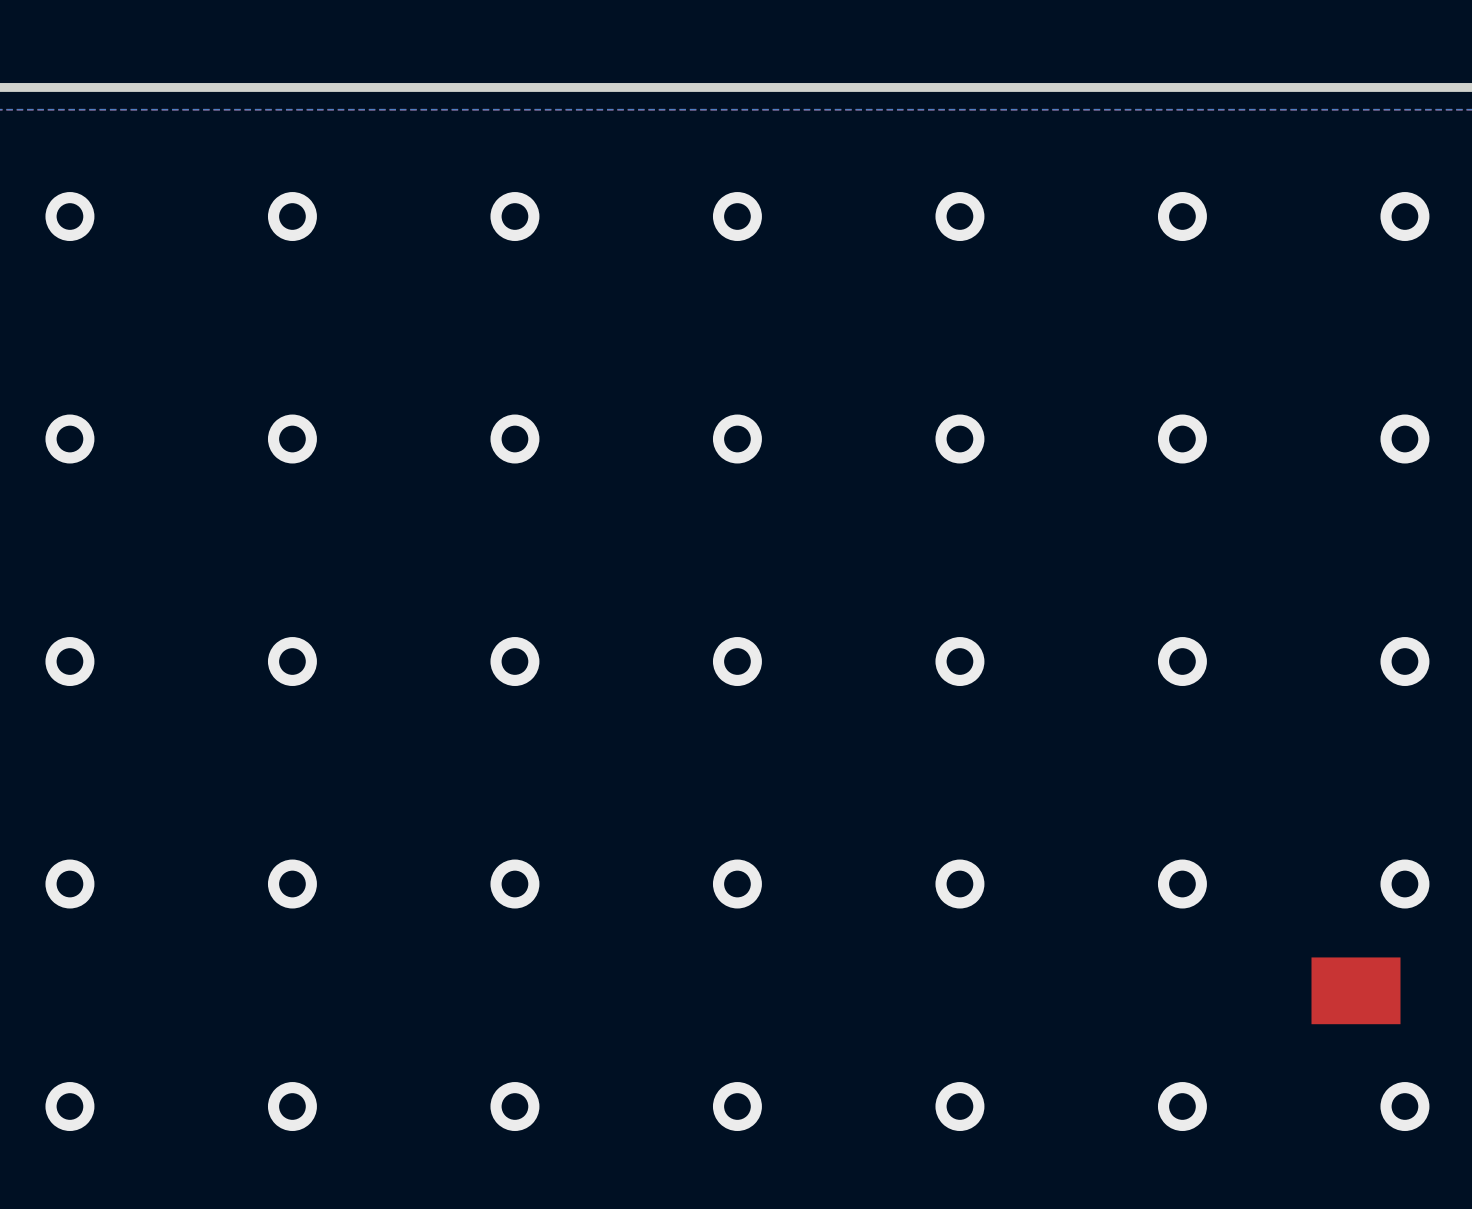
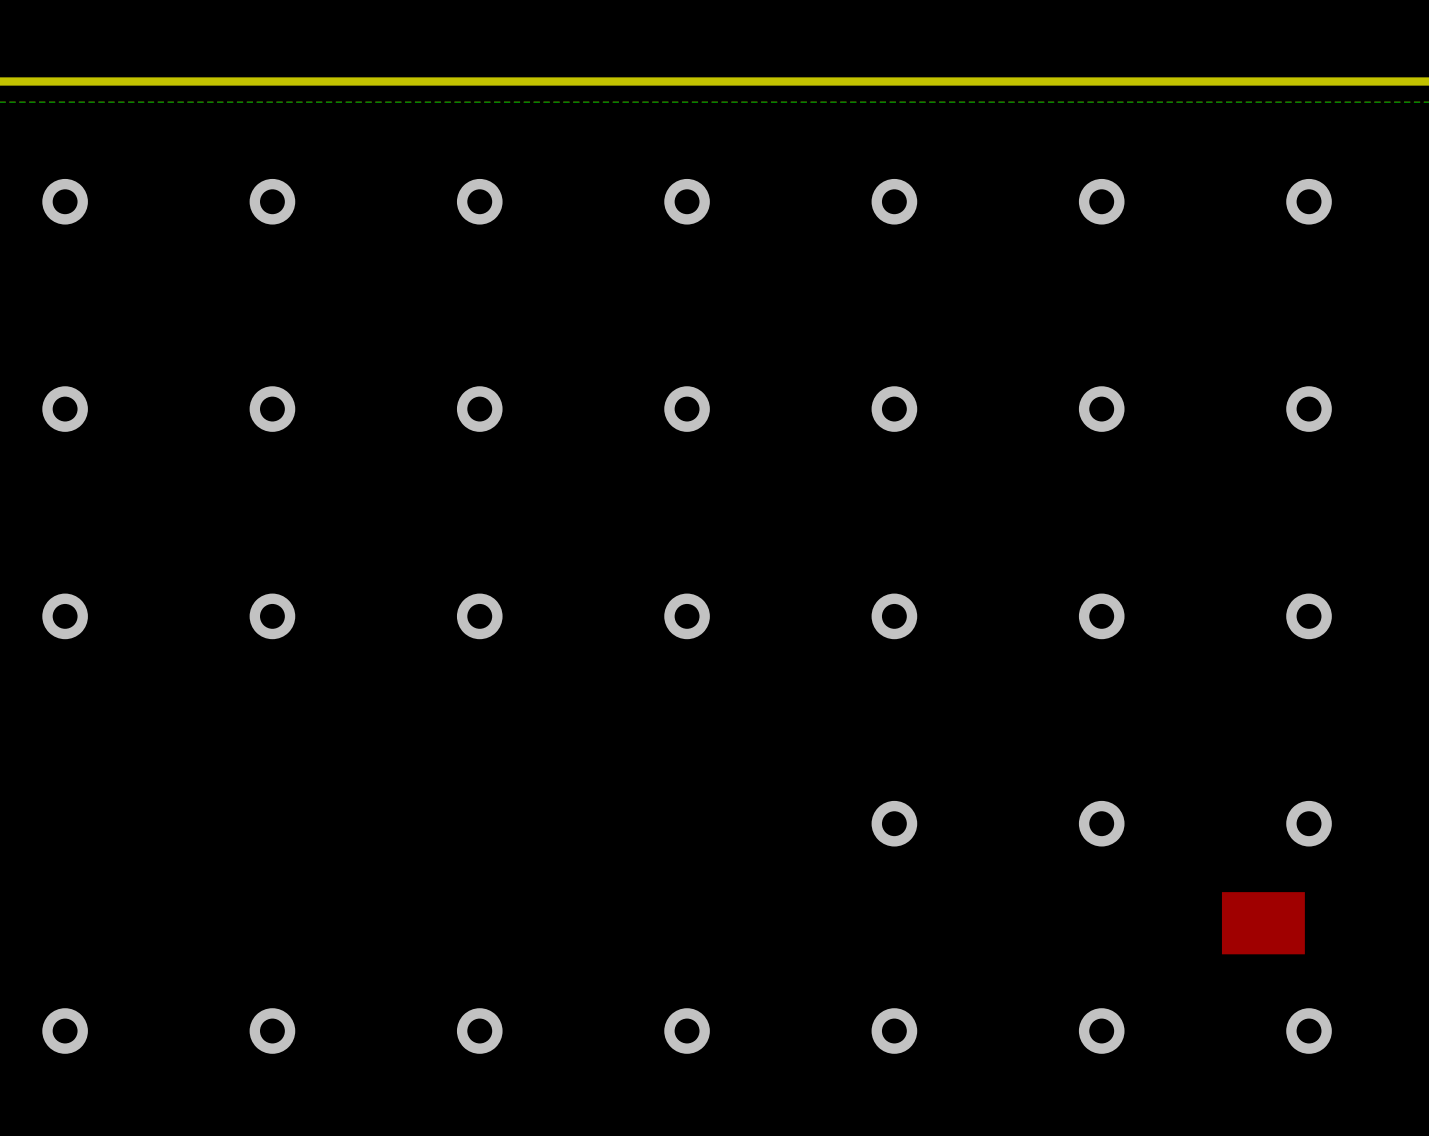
via: (69, 884) -> none
via: (292, 884) -> none
via: (514, 884) -> none
via: (737, 884) -> none

